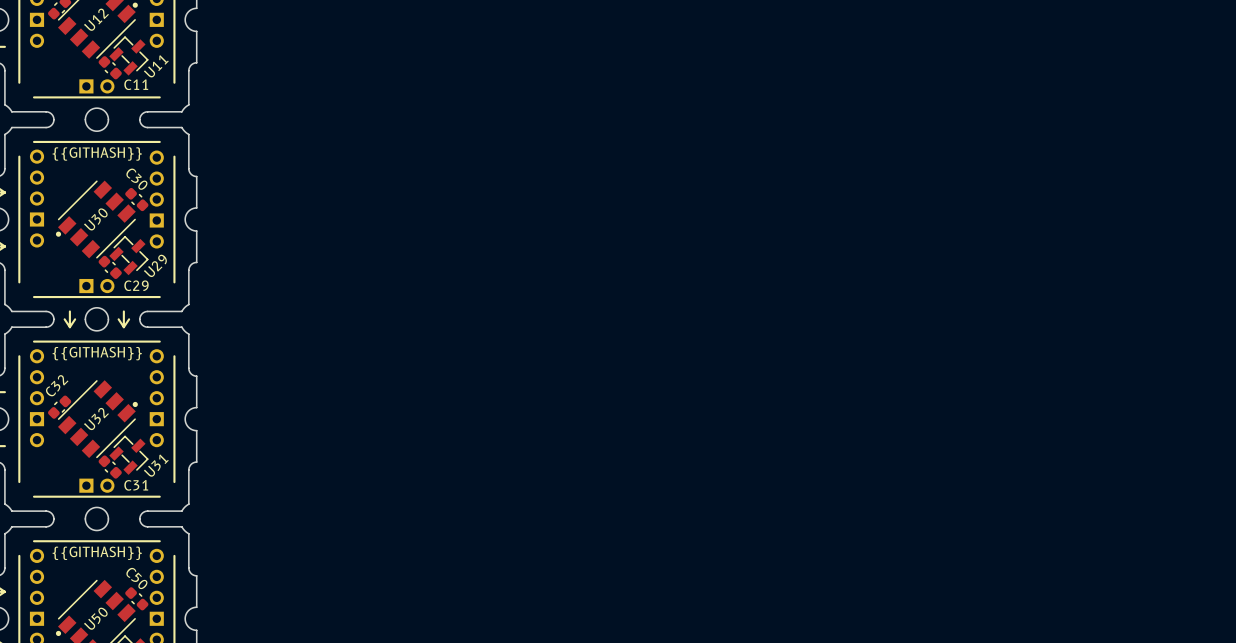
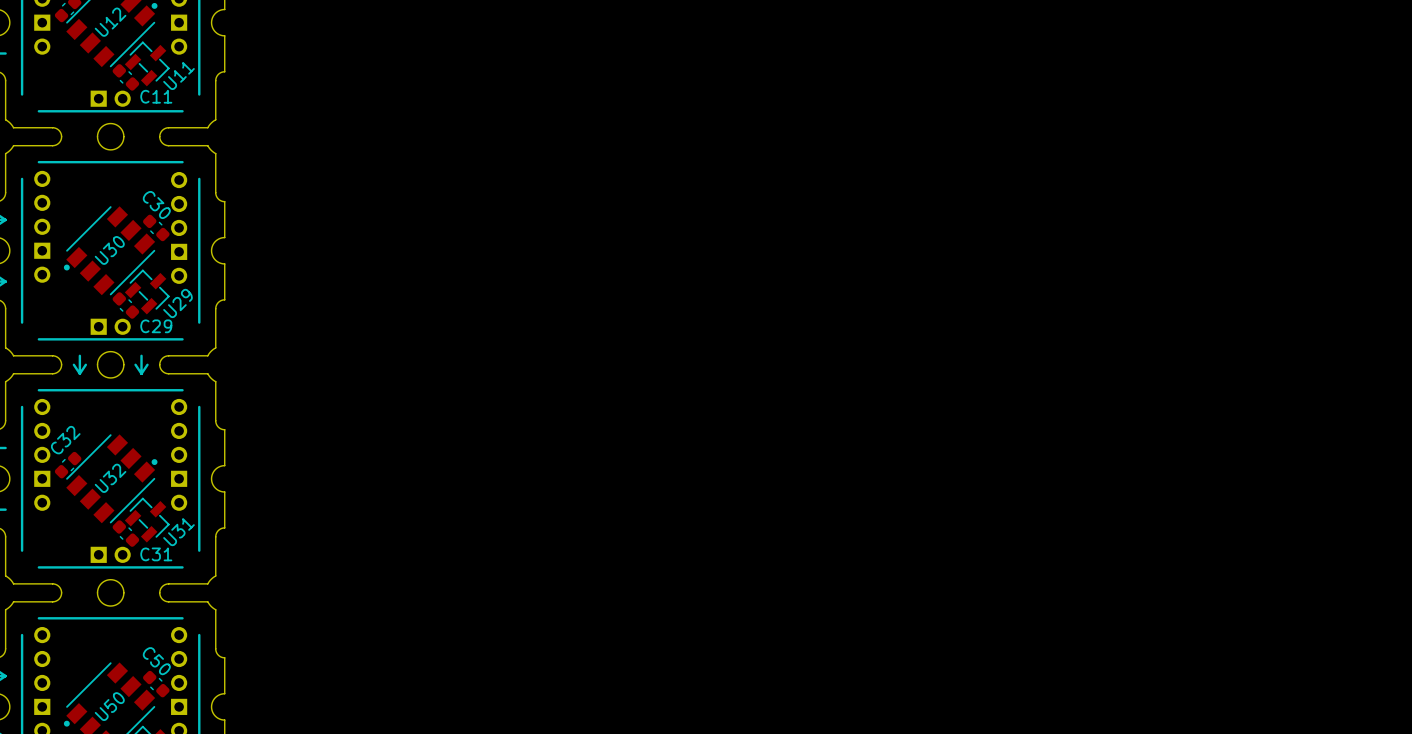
text: {{GITHASH}} (97, 154) -> none
text: {{GITHASH}} (97, 353) -> none
text: {{GITHASH}} (97, 553) -> none

